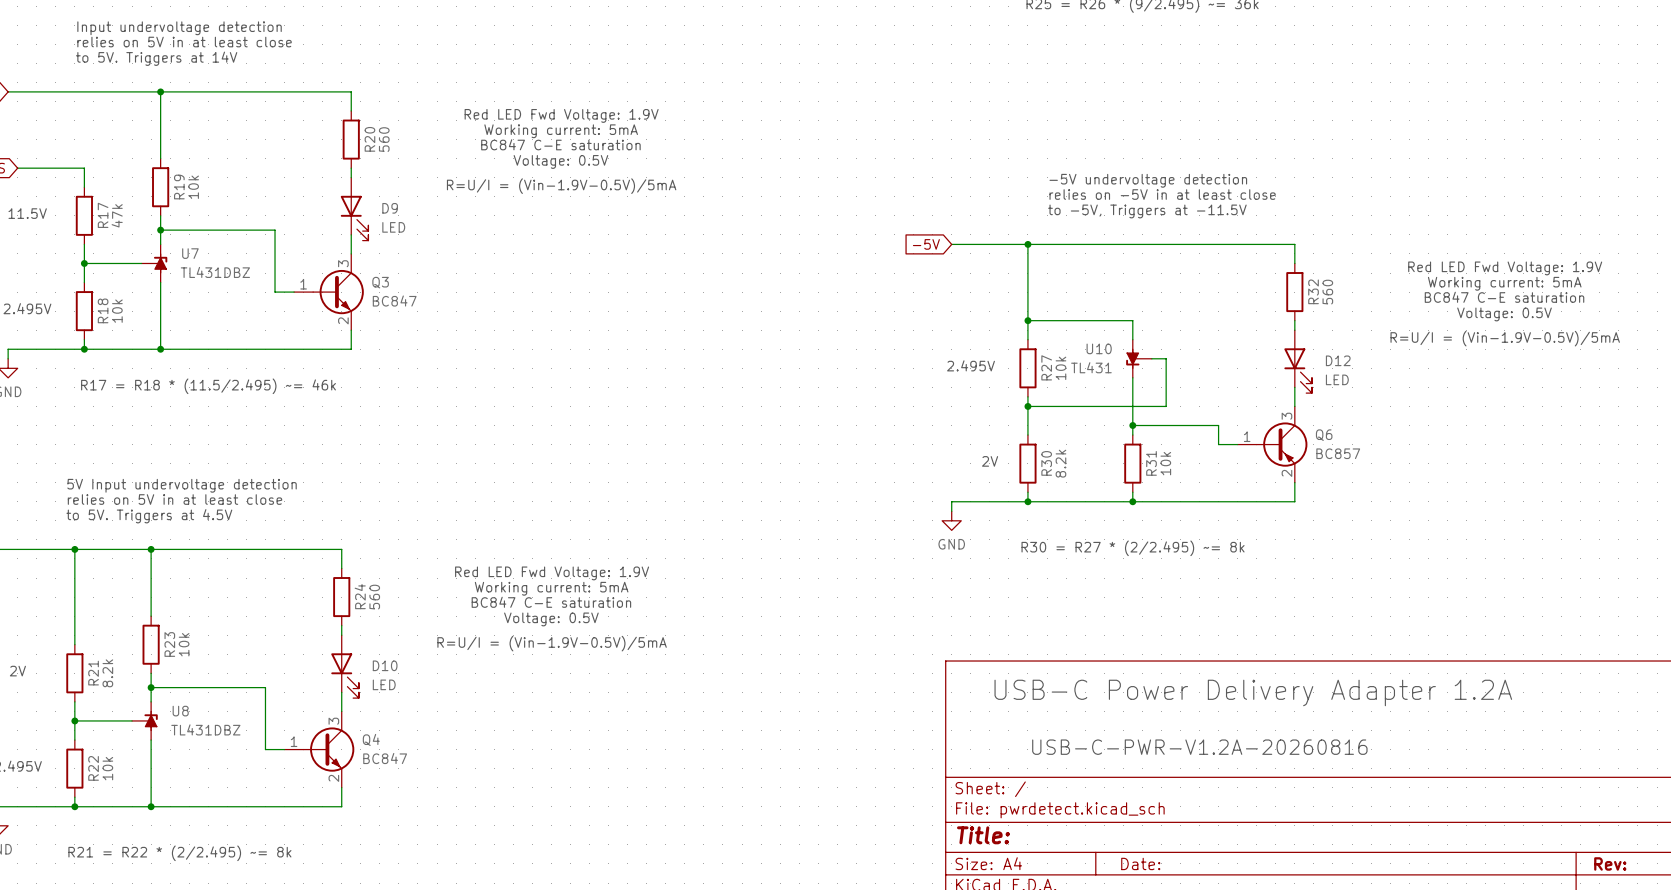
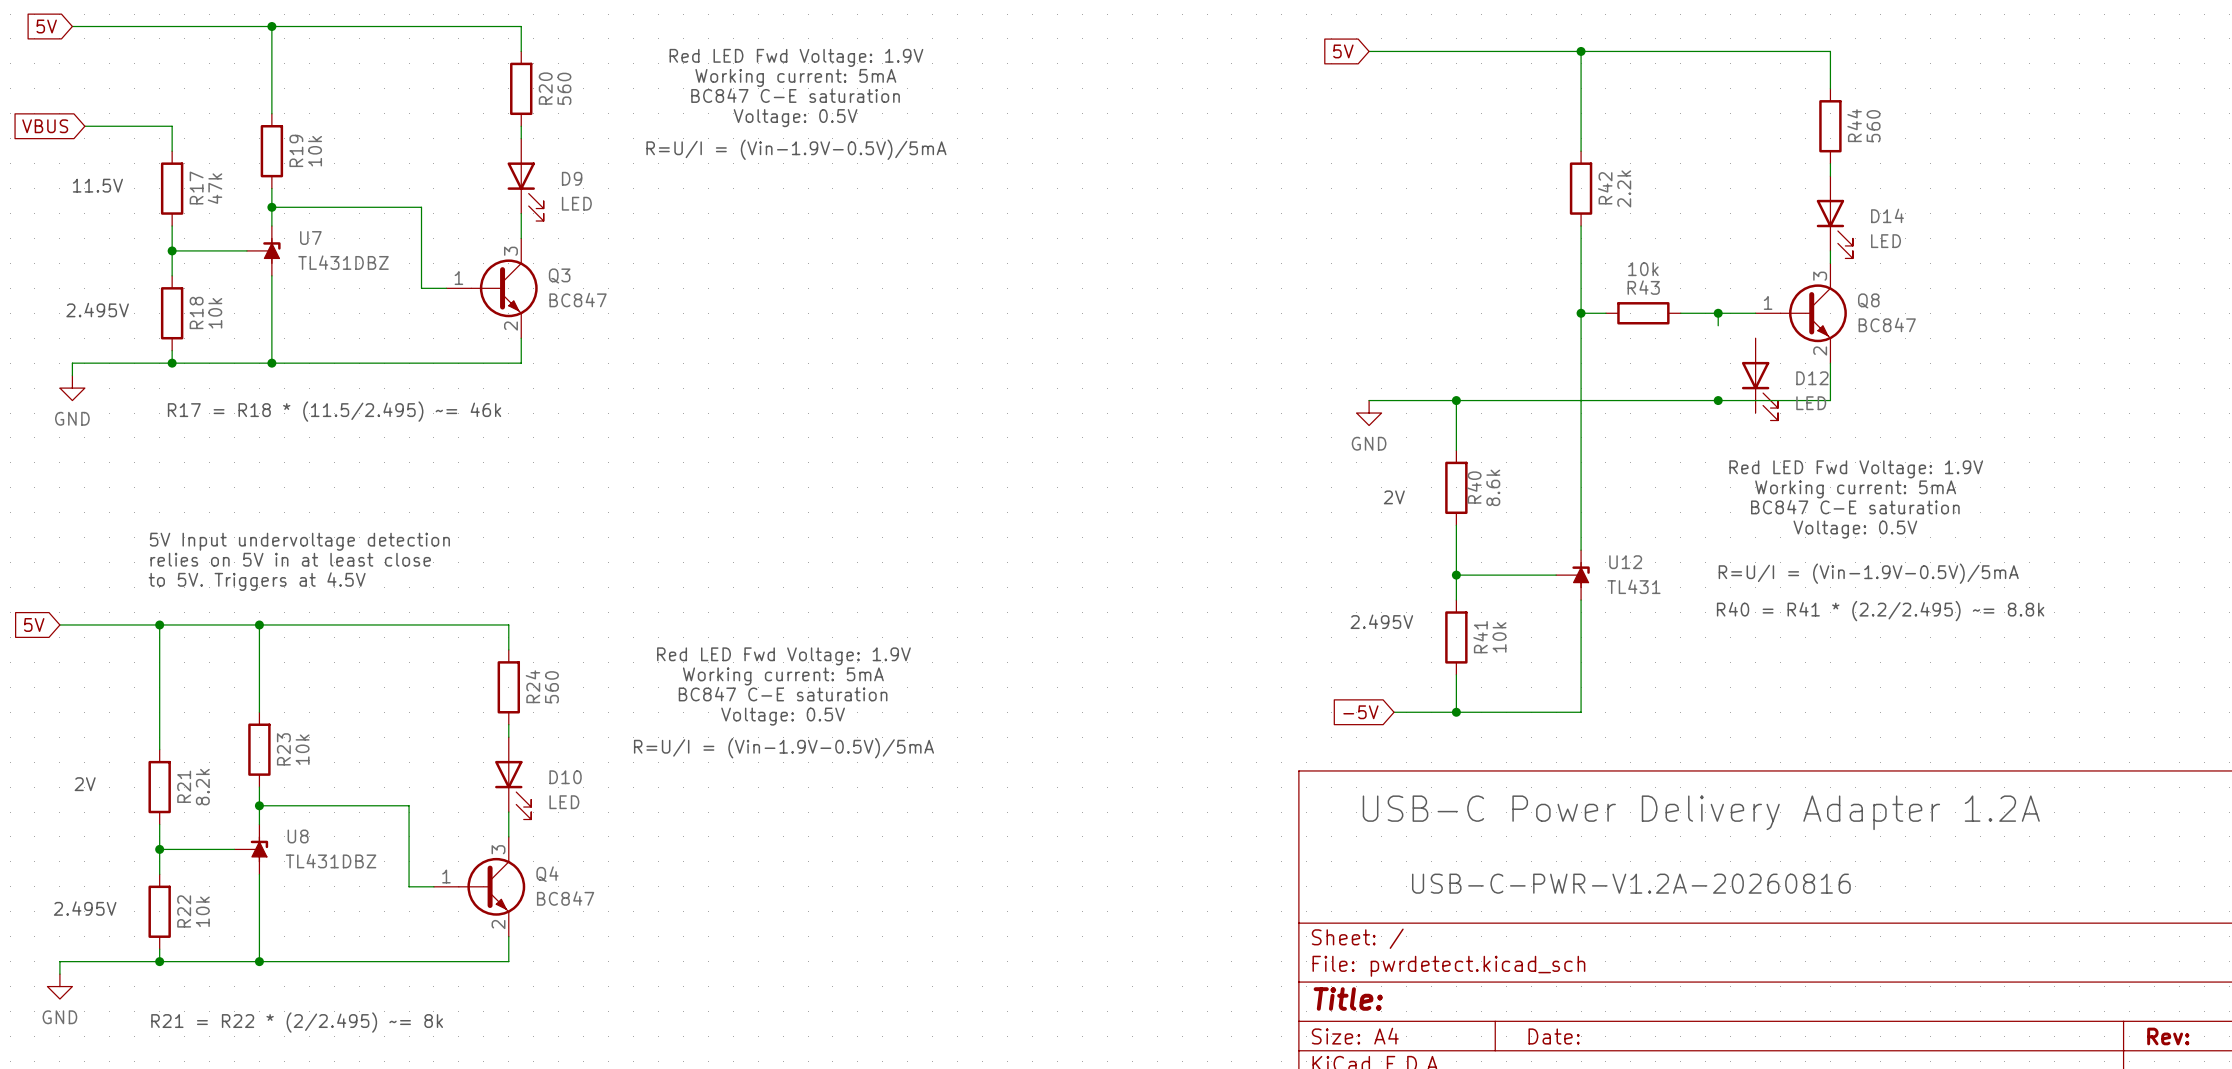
global label: none -> 5V (1343, 51)
wire: none -> (1369, 51) (1830, 51) (1830, 88)
wire: none -> (1581, 51) (1581, 151)
junction: none -> (1581, 51)
R44: none -> 560 (1830, 126)
text: -5V undervoltage detection (1148, 180) -> none
text: relies on -5V in at least close (1162, 194) -> none
wire: none -> (1830, 163) (1830, 176)
text: to -5V, Triggers at -11.5V (1147, 211) -> none
R42: none -> 2.2k (1581, 188)
D14: none -> LED (1834, 217)
global label: -5V (926, 244) -> none
wire: (951, 244) (1294, 244) (1294, 263) -> none
wire: (1027, 244) (1027, 339) -> none
junction: (1027, 244) -> none
wire: none -> (1581, 226) (1581, 550)
wire: none -> (1830, 250) (1830, 263)
text: Red LED Fwd Voltage: 1.9V (1505, 268) -> none
text: Working current: 5mA (1504, 283) -> none
R32: 560 (1294, 292) -> none
text: BC847 C-E saturation (1504, 297) -> none
wire: none -> (1581, 313) (1605, 313)
junction: none -> (1581, 313)
R43: none -> 10k (1643, 313)
wire: none -> (1680, 313) (1755, 313)
junction: none -> (1718, 313)
Q8: none -> BC847 (1801, 313)
text: Voltage: 0.5V (1504, 314) -> none
wire: (1027, 320) (1132, 320) (1132, 339) -> none
junction: (1027, 320) -> none
wire: (1294, 320) (1294, 330) -> (1718, 313) (1718, 325)
text: R=U/I = (Vin-1.9V-0.5V)/5mA (1505, 338) -> none
wire: none -> (1830, 363) (1830, 400) (1369, 400)
U10: TL431 (1138, 358) -> none
wire: (1151, 358) (1166, 358) (1166, 406) (1027, 406) -> none
text position: 2.495V (971, 365) -> 2.495V (1381, 621)
R27: 10k (1027, 368) -> none
junction: none -> (1456, 400)
wire: (1132, 377) (1132, 435) -> (1456, 525) (1456, 600)
junction: none -> (1718, 400)
wire: (1294, 387) (1294, 406) -> none
wire: (1027, 396) (1027, 435) -> (1456, 400) (1456, 450)
junction: (1027, 406) -> none
wire: (1132, 425) (1218, 425) (1218, 444) (1237, 444) -> none
junction: (1132, 425) -> none
text: none -> Red LED Fwd Voltage: 1.9V (1856, 469)
R40: none -> 8.6k (1456, 487)
Q6: BC857 (1272, 444) -> none
text: none -> Working current: 5mA (1855, 489)
text: none -> BC847 C-E saturation (1855, 507)
text position: 2V (990, 461) -> 2V (1394, 497)
R30: 8.2k (1027, 463) -> none
R31: 10k (1132, 463) -> none
text: none -> Voltage: 0.5V (1855, 529)
wire: (1294, 482) (1294, 501) (951, 501) (951, 511) -> none
wire: (1027, 492) (1027, 501) -> none
wire: (1132, 492) (1132, 501) -> none
junction: (1027, 501) -> none
junction: (1132, 501) -> none
text: none -> R=U/I = (Vin-1.9V-0.5V)/5mA (1868, 573)
wire: none -> (1456, 575) (1556, 575)
junction: none -> (1456, 575)
U12: none -> TL431 (1572, 575)
power symbol position: GND (951, 520) -> GND (1369, 413)
wire: none -> (1581, 600) (1581, 712) (1394, 712)
text: none -> R40 = R41 * (2.2/2.495) ~= 8.8k (1880, 611)
text: R30 = R27 * (2/2.495) ~= 8k (1133, 548) -> none
R41: none -> 10k (1456, 637)
wire: none -> (1456, 674) (1456, 712)
global label: none -> -5V (1360, 712)
junction: none -> (1456, 712)

